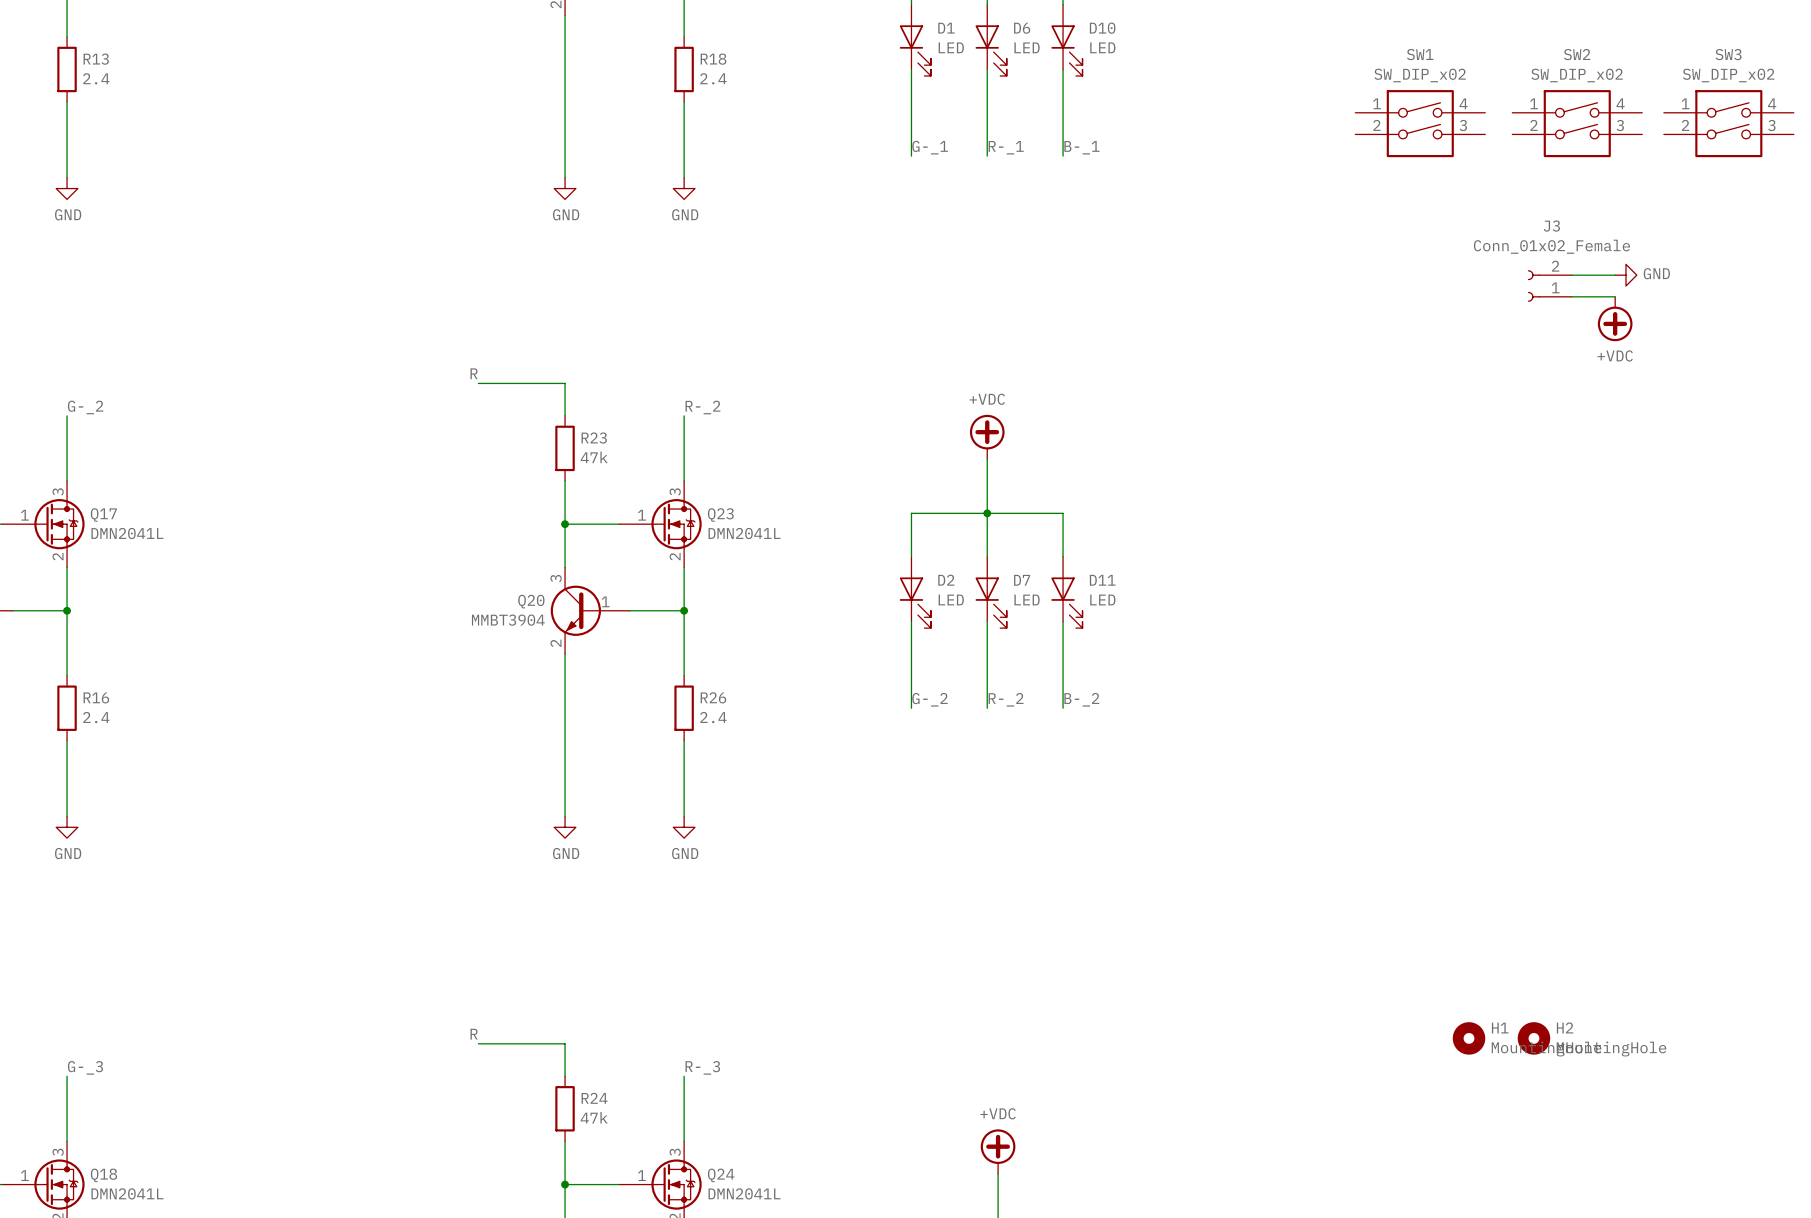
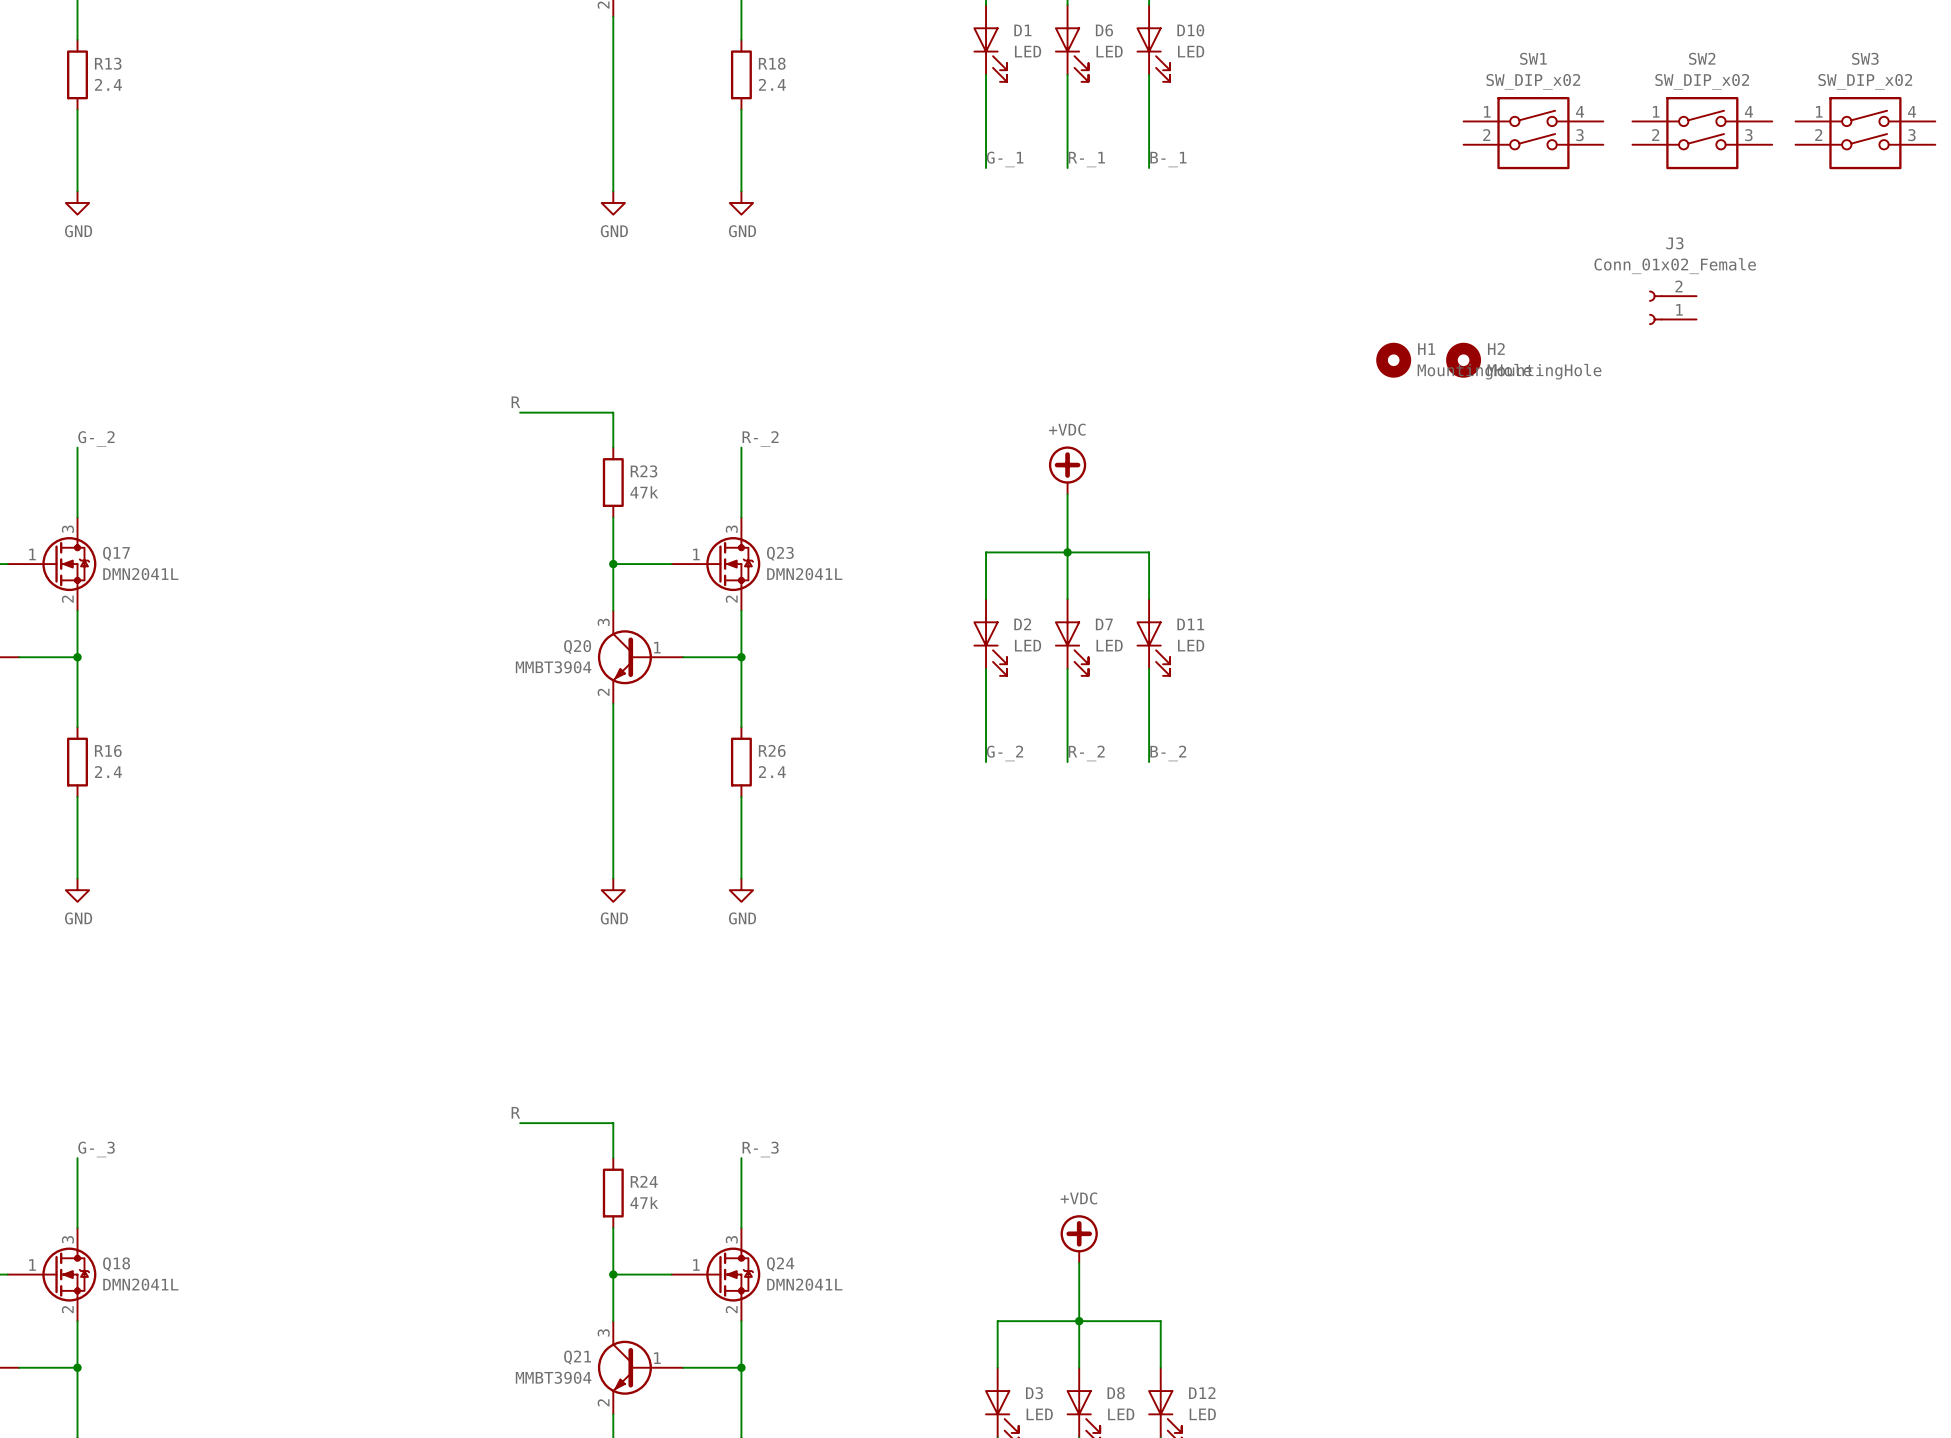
wire: (1571, 275) (1615, 275) -> none
power symbol: GND (1625, 275) -> none
wire: (1571, 296) (1615, 296) -> none
power symbol: +VDC (1615, 319) -> none
H1 position: (1469, 1038) -> (1393, 360)
H2 position: (1533, 1038) -> (1463, 360)

